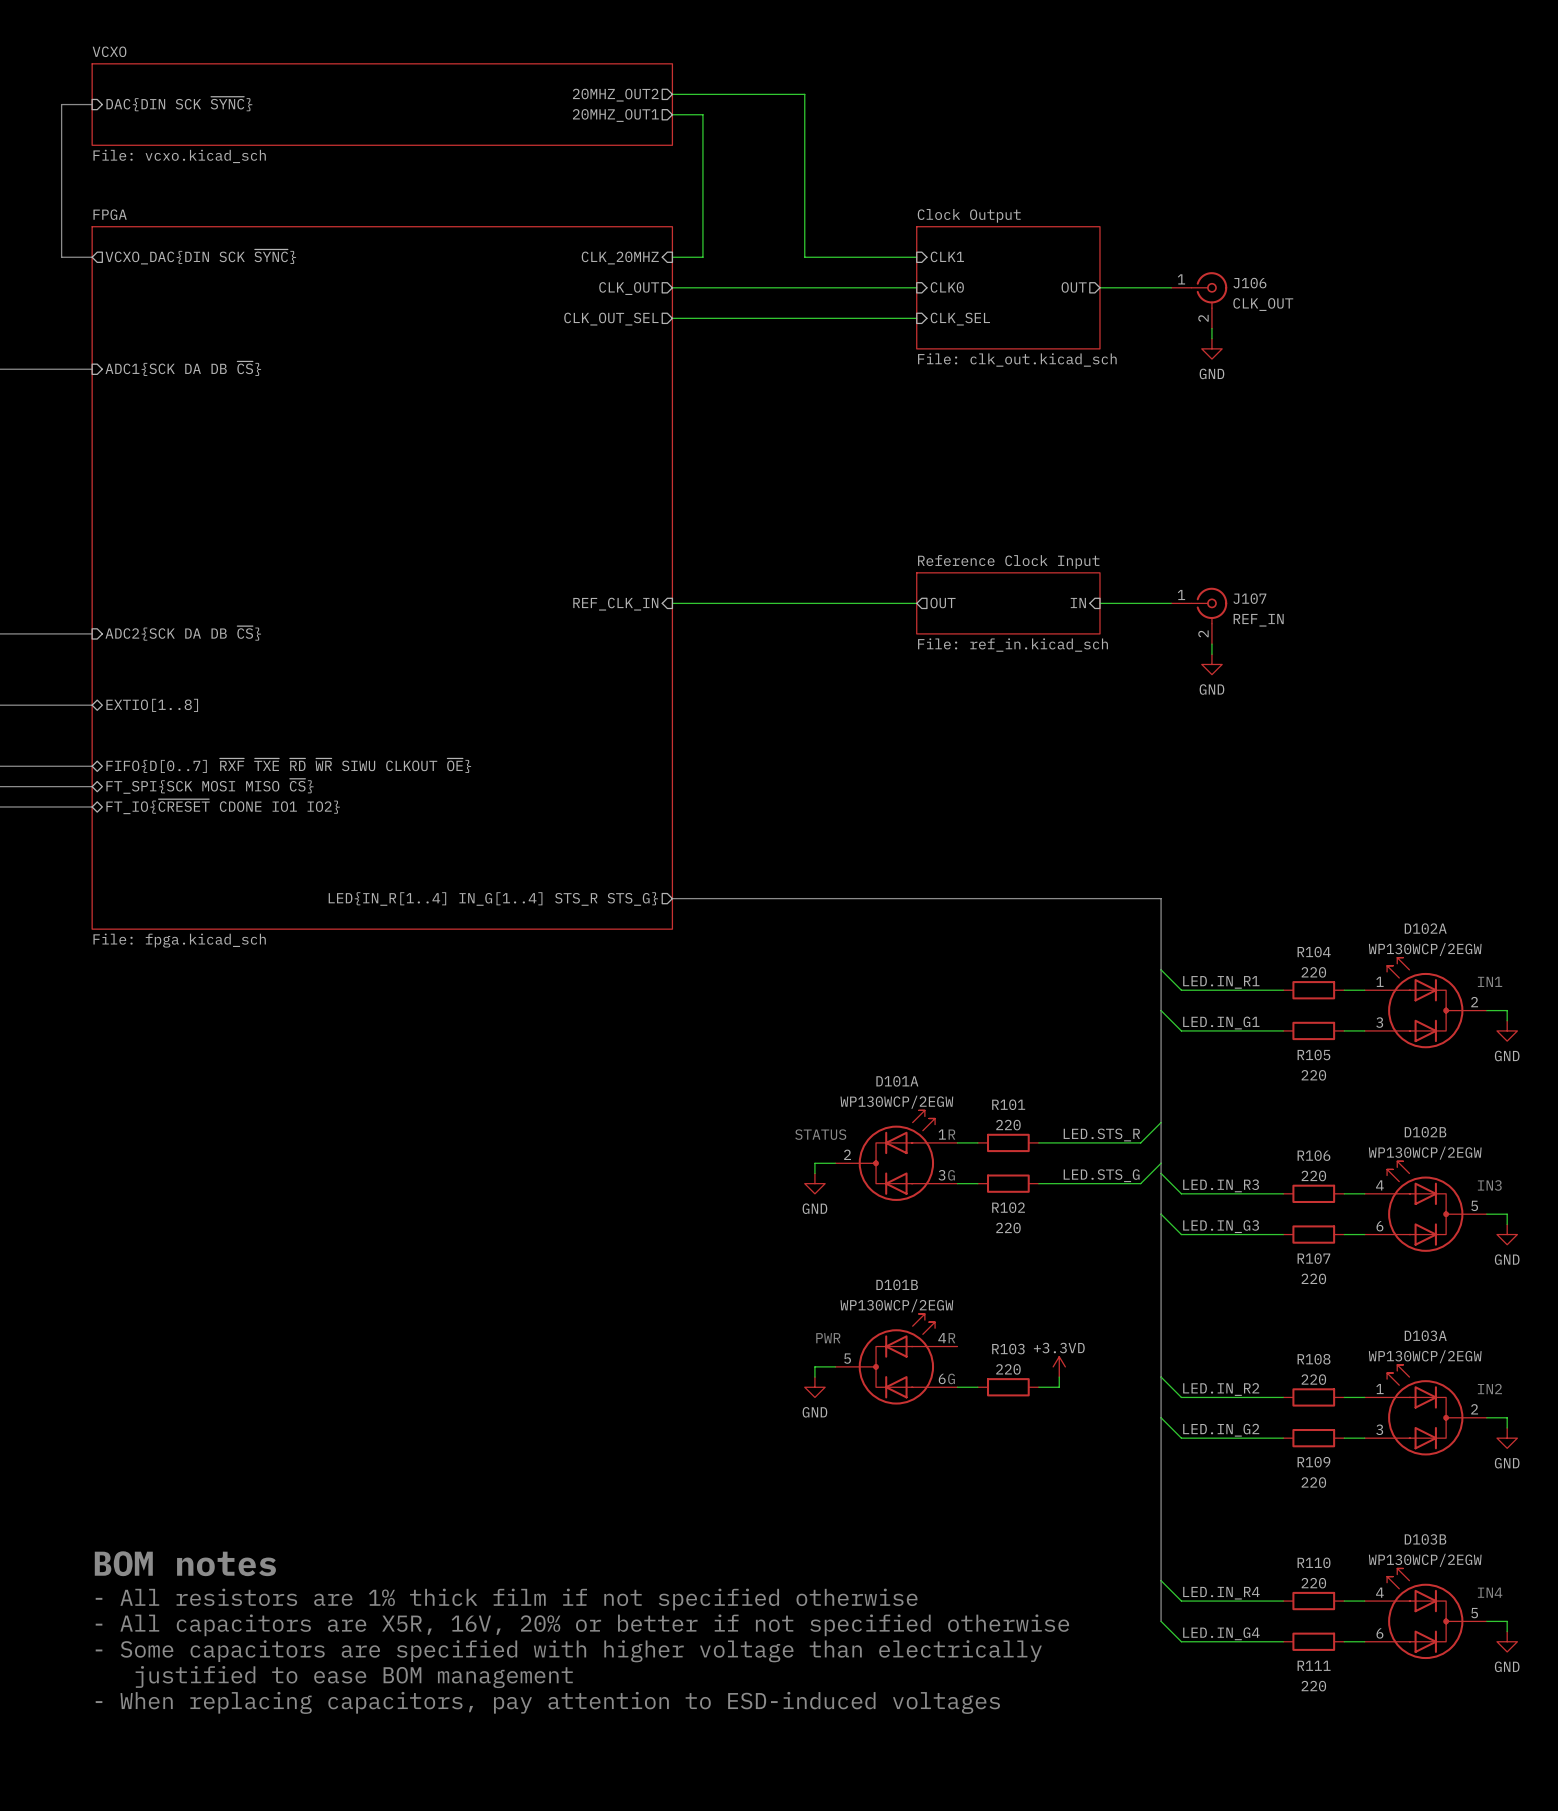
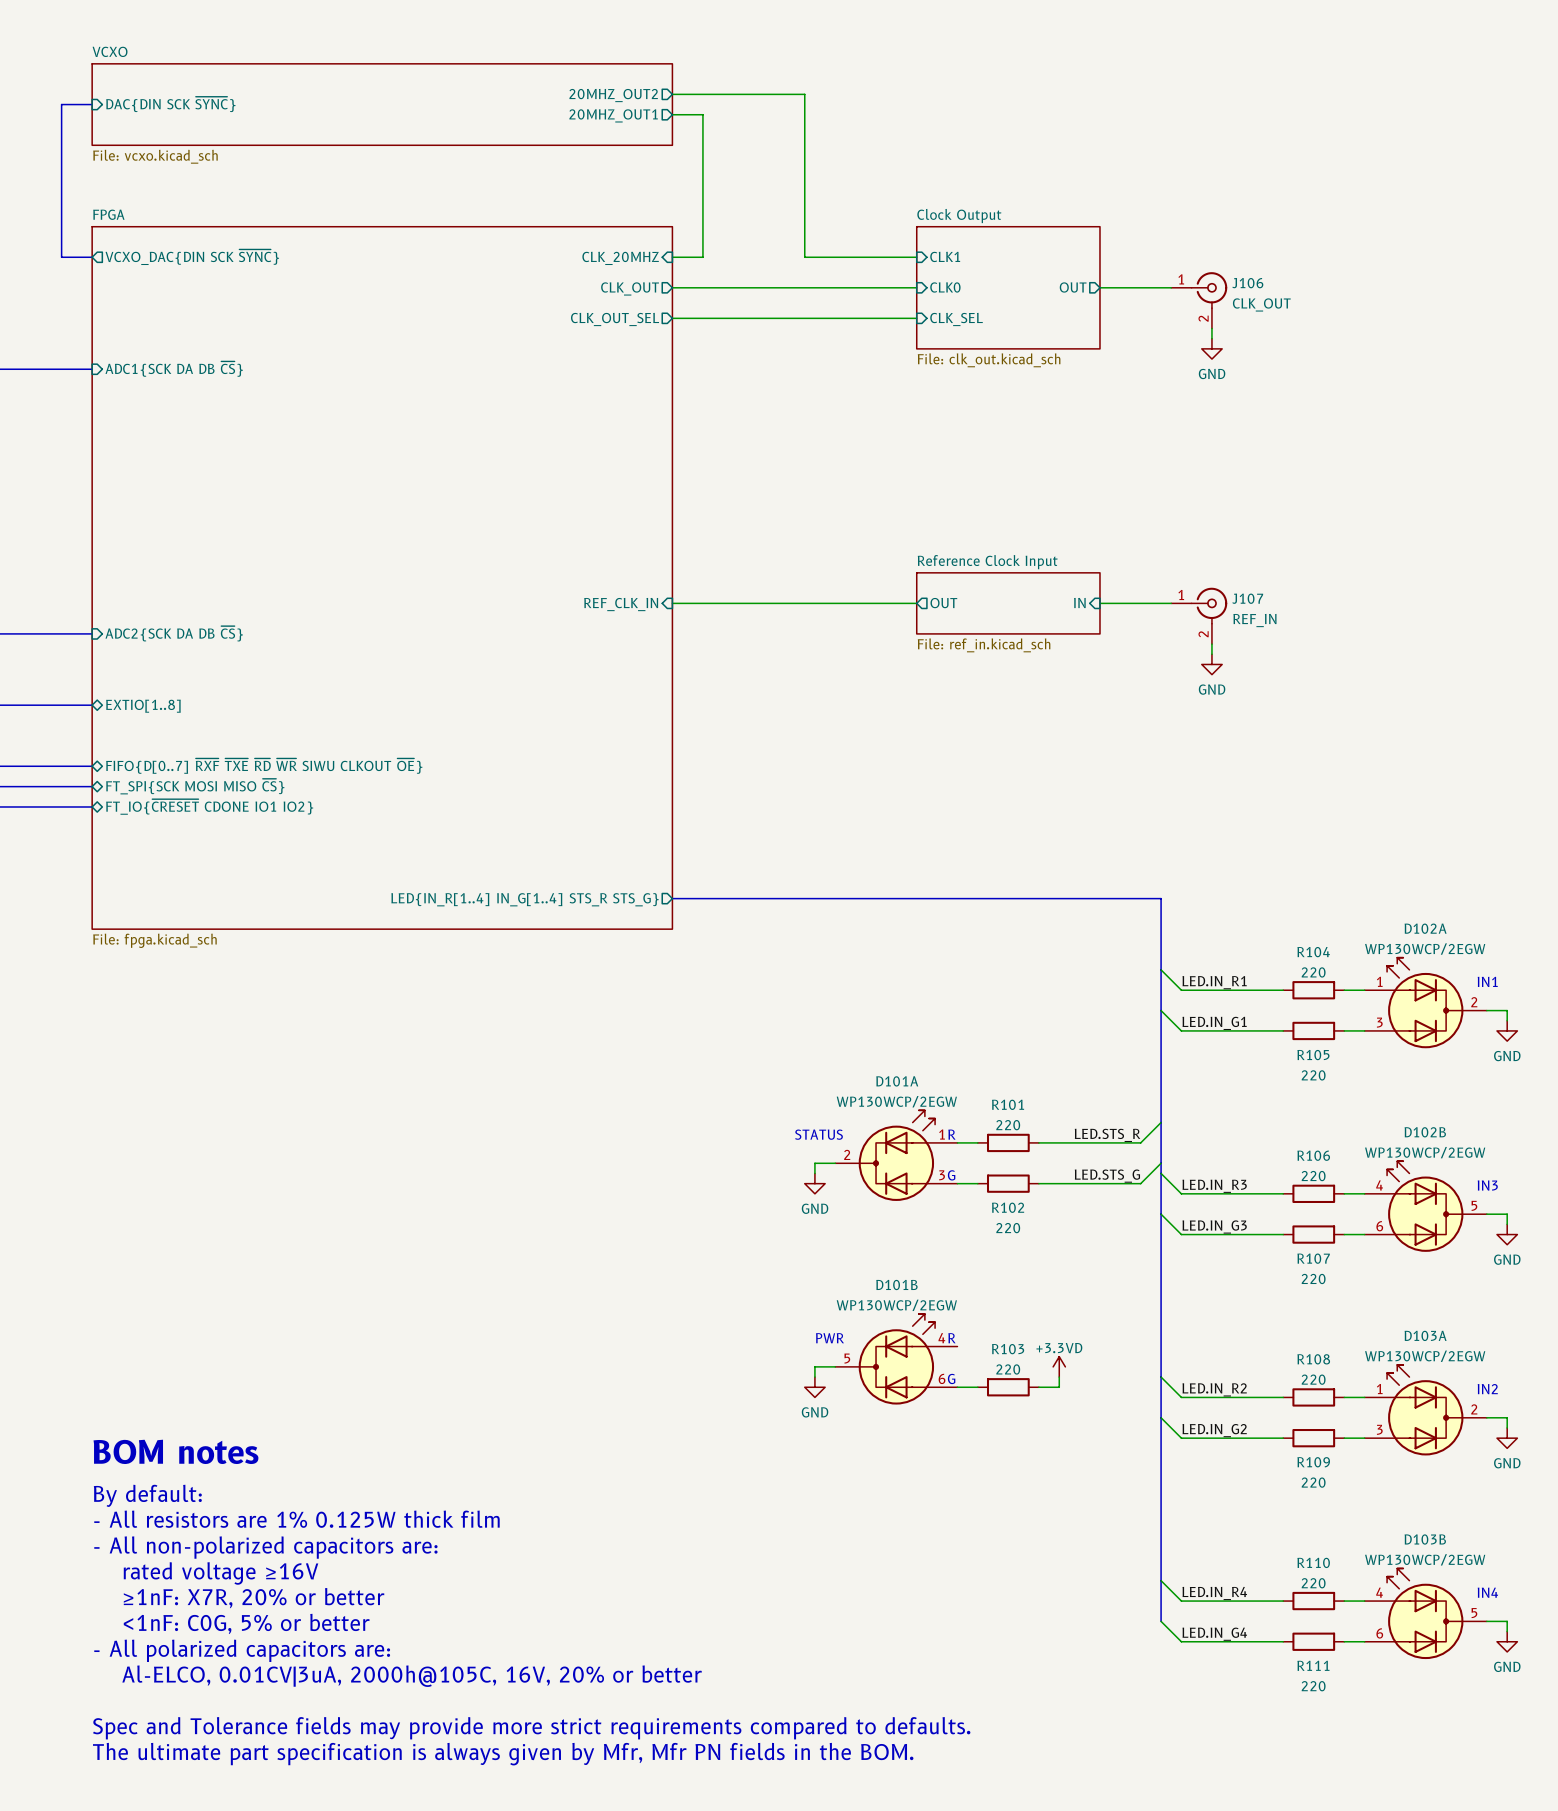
text: none -> By default: (147, 1495)
text: none -> - All resistors are 1% 0.125W thick film (296, 1519)
text: none -> - All non-polarized capacitors are: (265, 1547)
text position: BOM notes (185, 1563) -> BOM notes (175, 1451)
text: none -> rated voltage ≥16V (221, 1573)
text: - All resistors are 1% thick film if not specified otherwise (506, 1599) -> ≥1nF: X7R, 20% or better (254, 1598)
text: - All capacitors are X5R, 16V, 20% or better if not specified otherwise (582, 1625) -> <1nF: C0G, 5% or better (246, 1623)
text: - Some capacitors are specified with higher voltage than electrically (568, 1651) -> - All polarized capacitors are: (242, 1650)
text: justified to ease BOM management (354, 1677) -> Al-ELCO, 0.01CV|3uA, 2000h@105C, 16V, 20% or better (412, 1676)
text: - When replacing capacitors, pay attention to ESD-induced voltages (547, 1702) -> none
text: none -> Spec and Tolerance fields may provide more strict requirements compared to defaults. (531, 1728)
text: none -> The ultimate part specification is always given by Mfr, Mfr PN fields in the BOM. (503, 1754)

